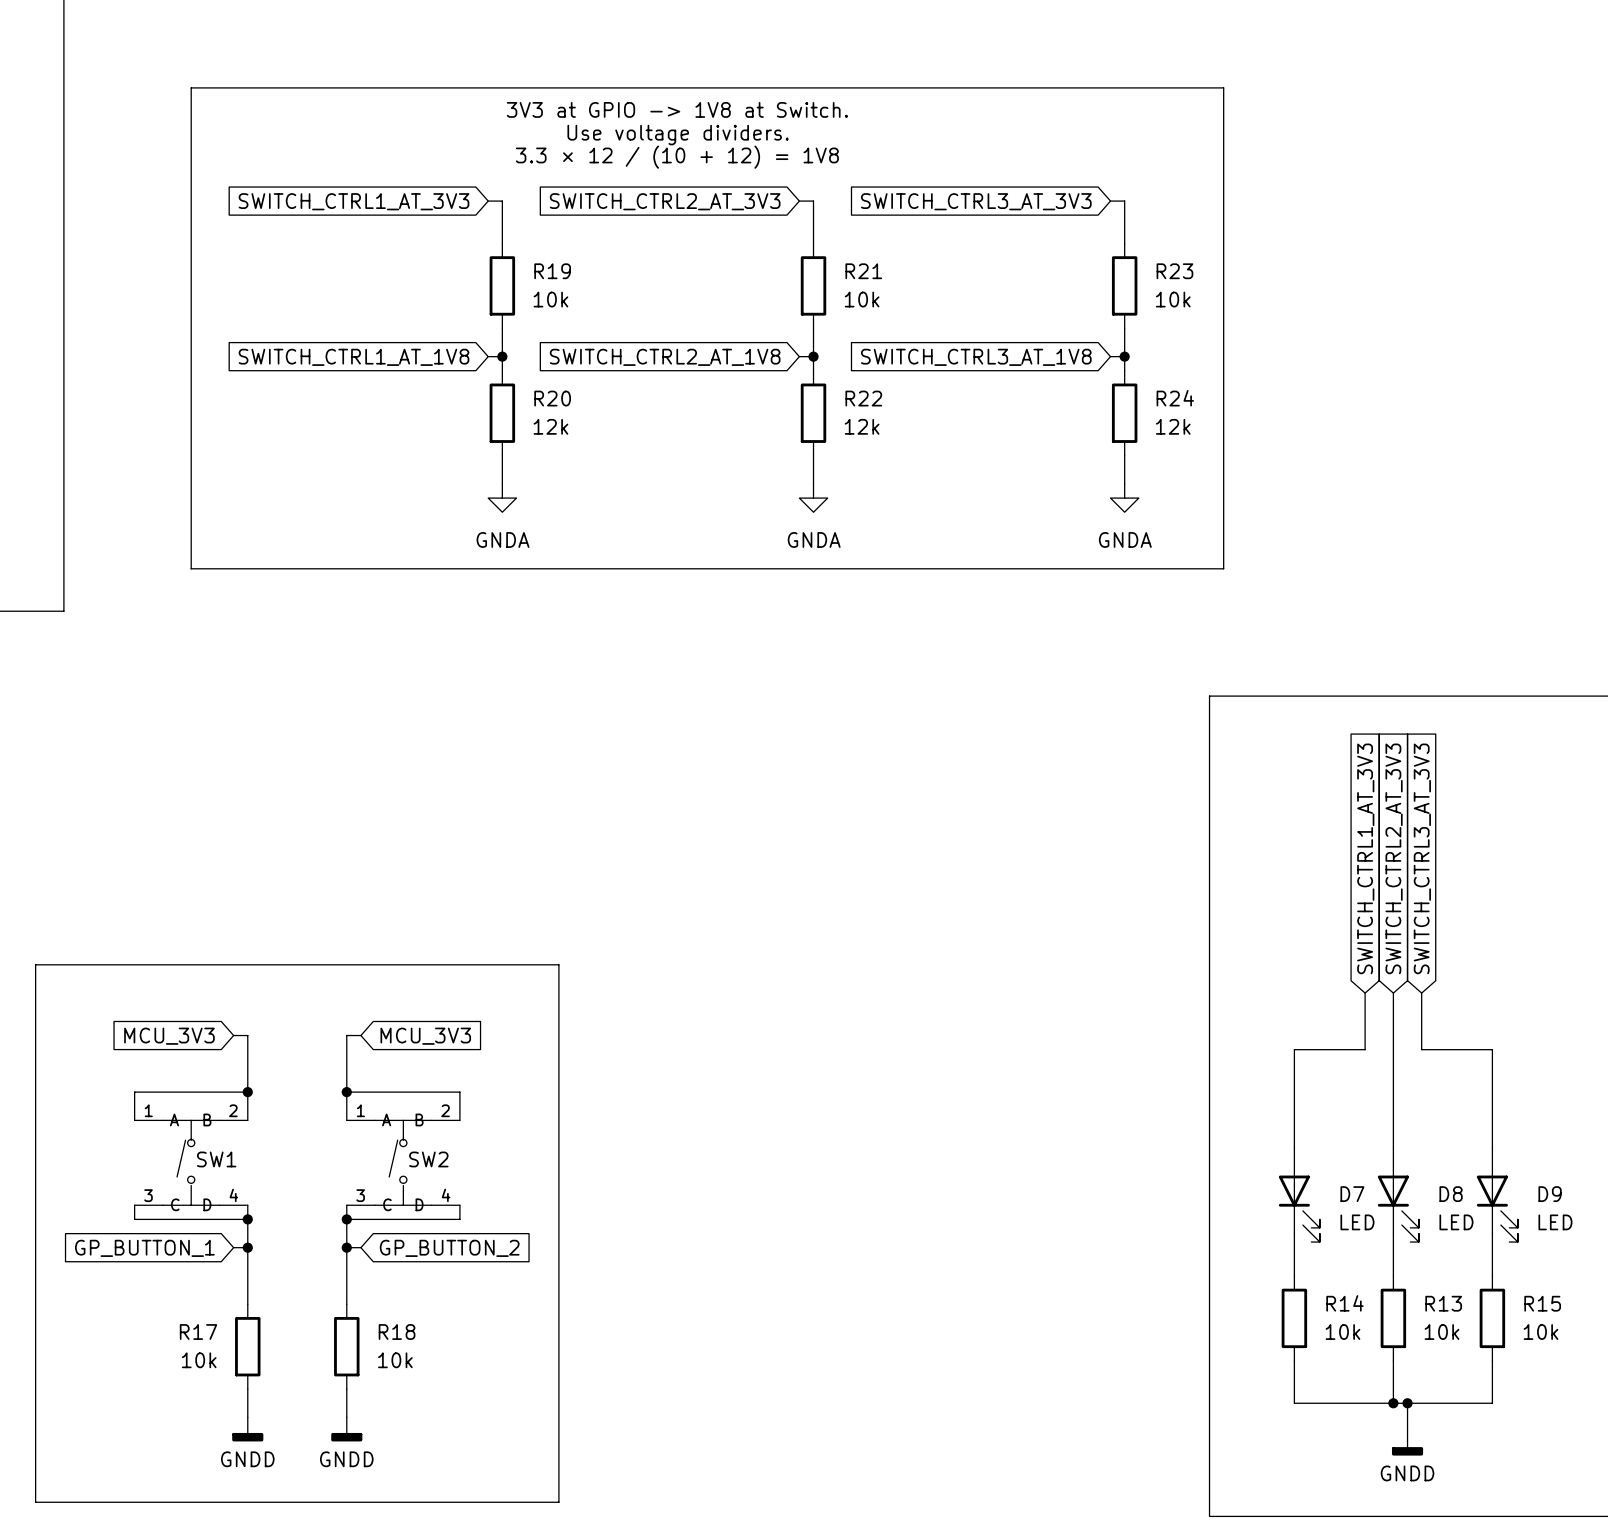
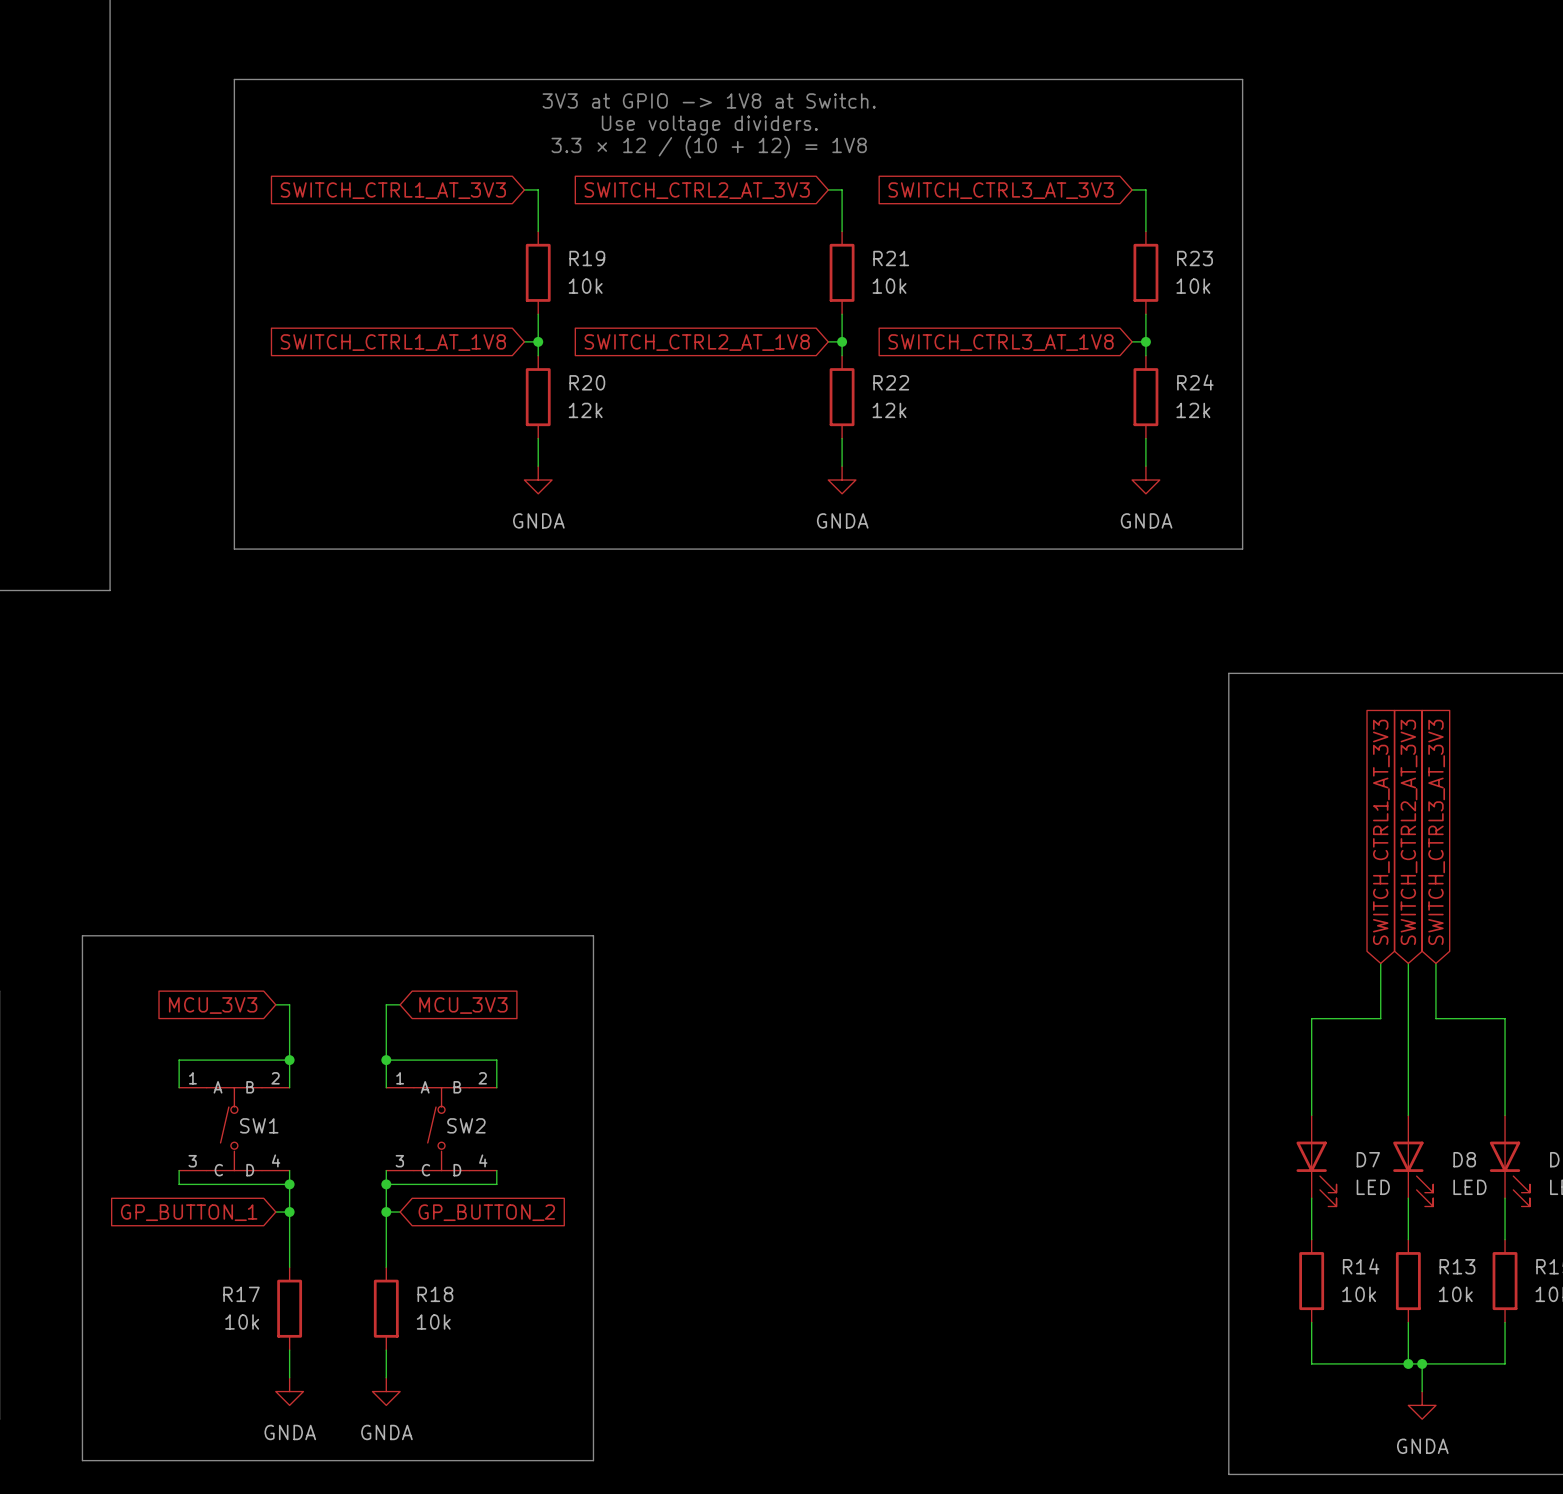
power symbol: GNDD (247, 1429) -> GNDA (289, 1391)
power symbol: GNDD (346, 1429) -> GNDA (386, 1391)
power symbol: GNDD (1407, 1443) -> GNDA (1422, 1405)

